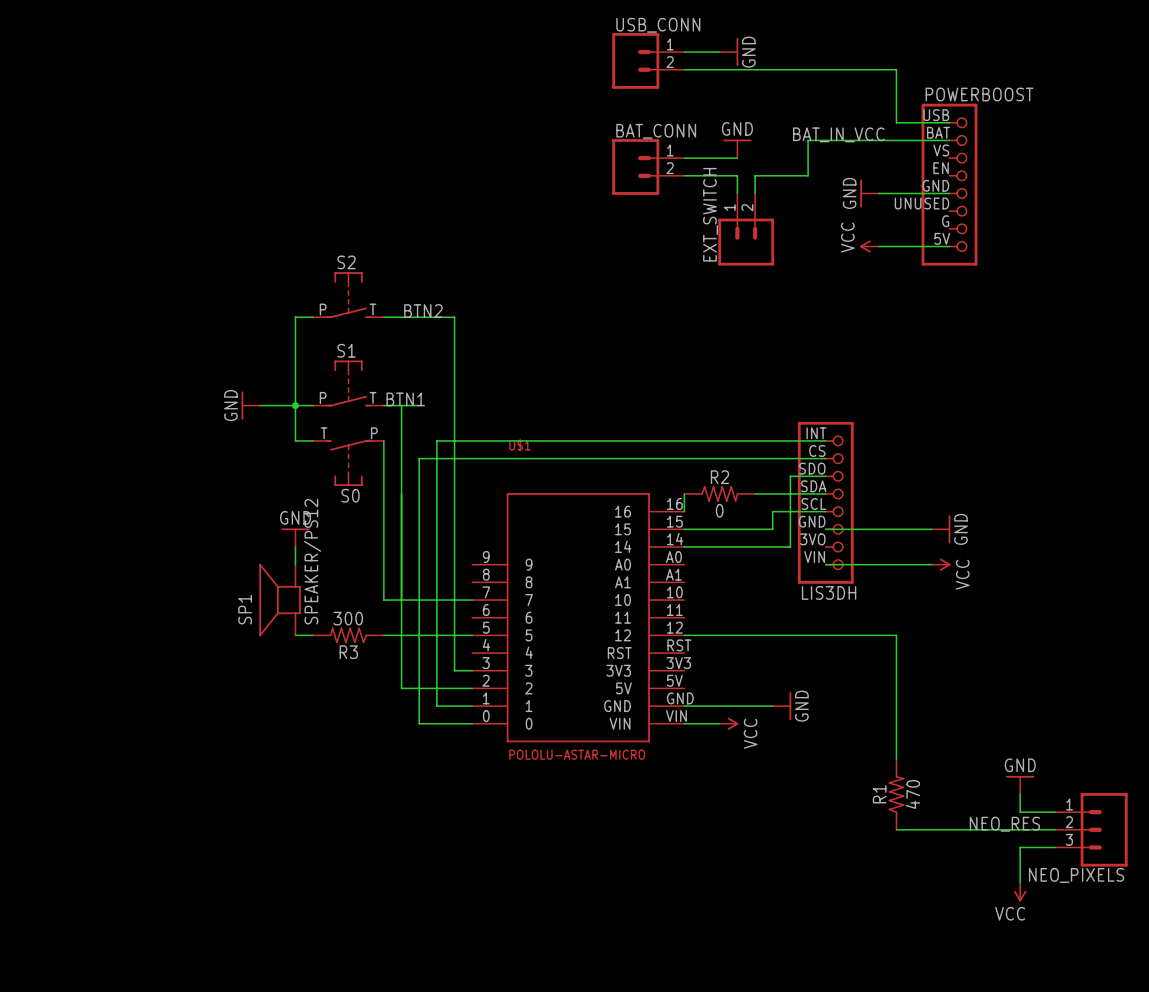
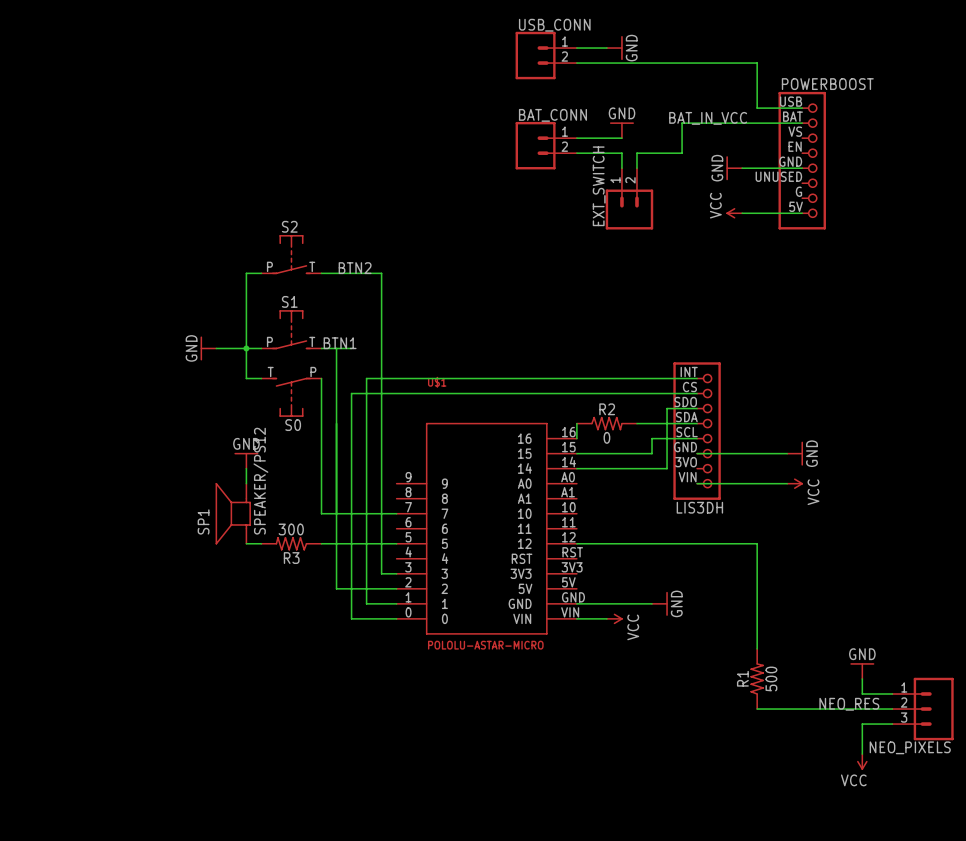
R1 value: 470 (912, 794) -> 500 (771, 678)

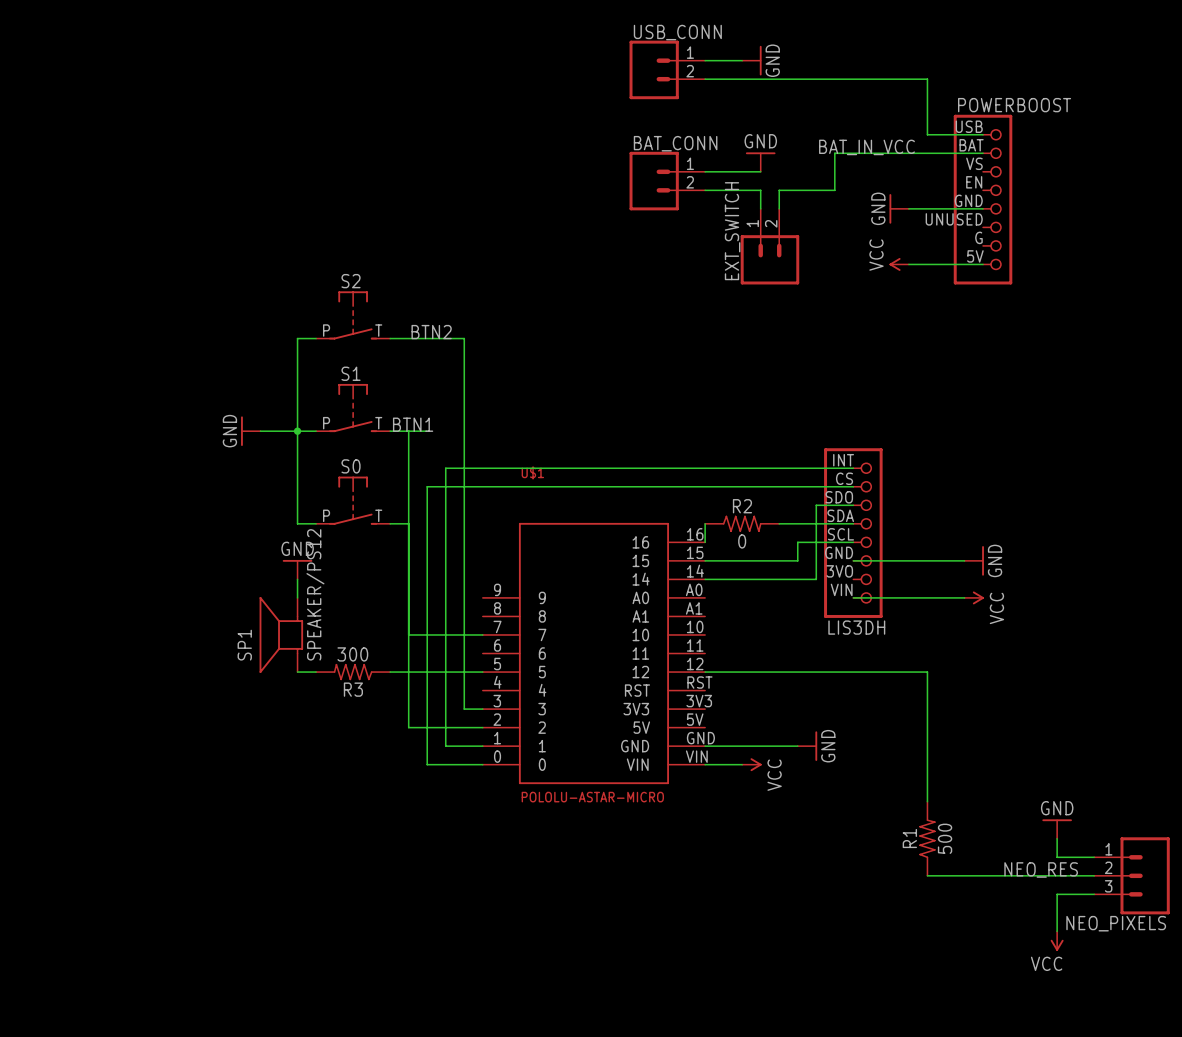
wire: (246, 378) (261, 378) -> (297, 468) (297, 523) (316, 523)
wire: (321, 378) (321, 513) (336, 513) -> none
S0 rotation: 0° (291, 397) -> 180° (353, 500)
wire: none -> (390, 523) (408, 523)

